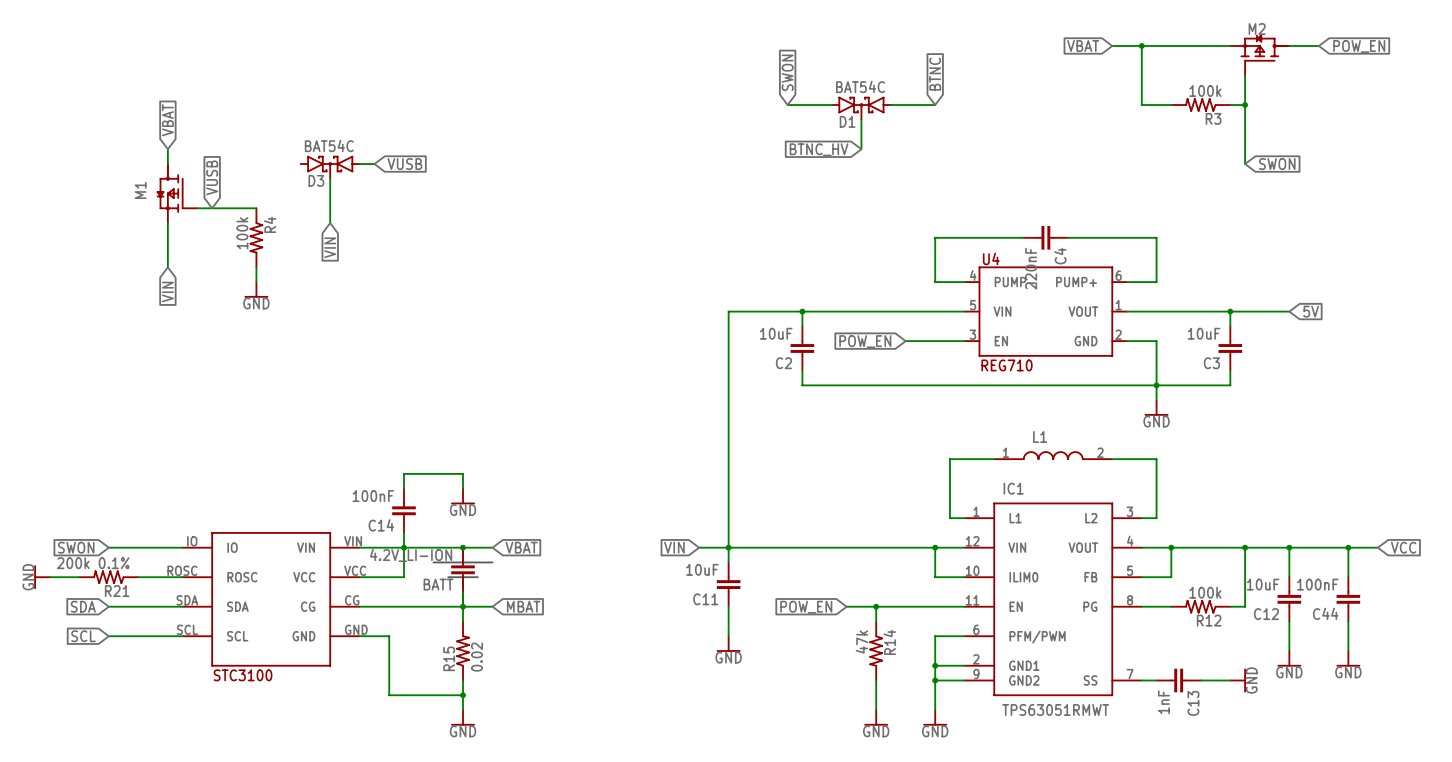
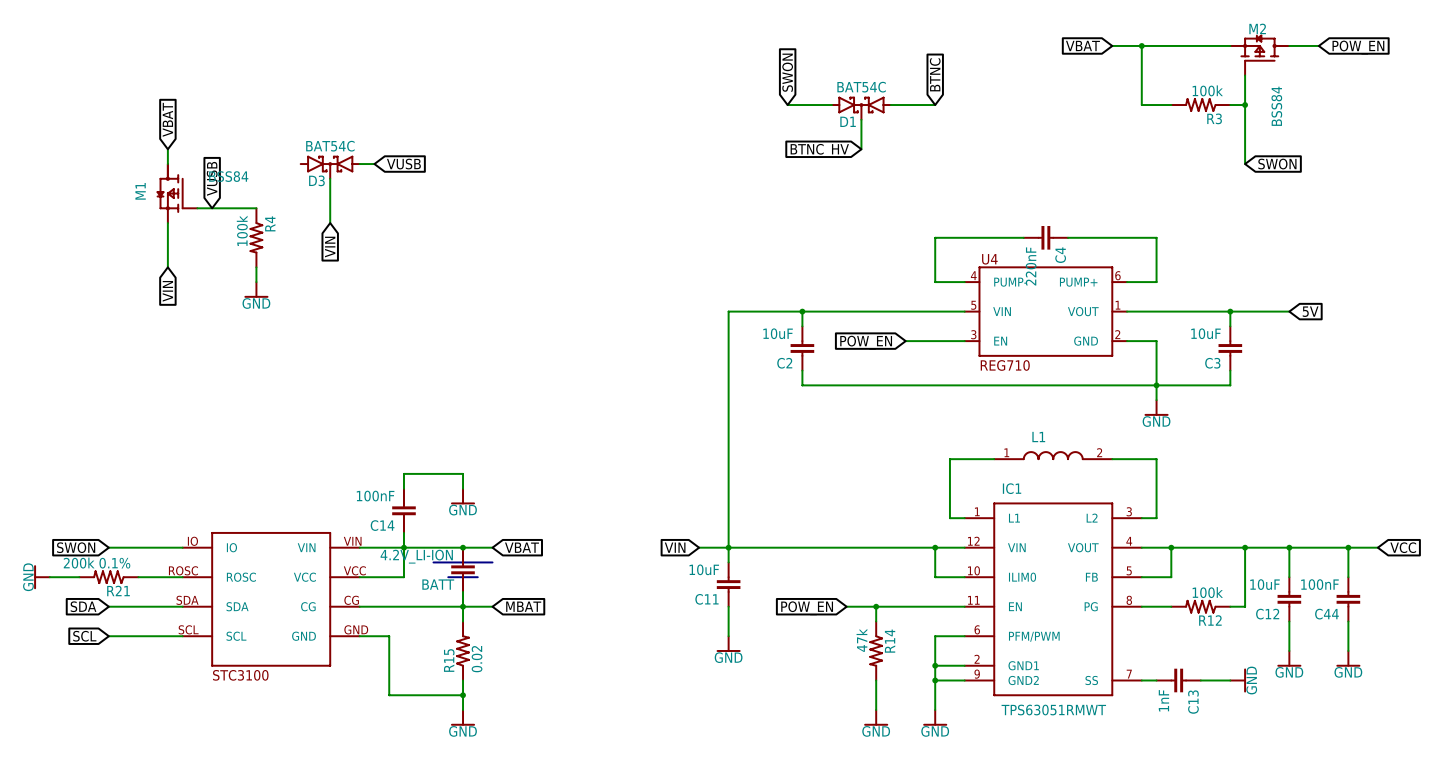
M2 value: none -> BSS84 (1276, 106)
M1 value: none -> BSS84 (228, 176)

